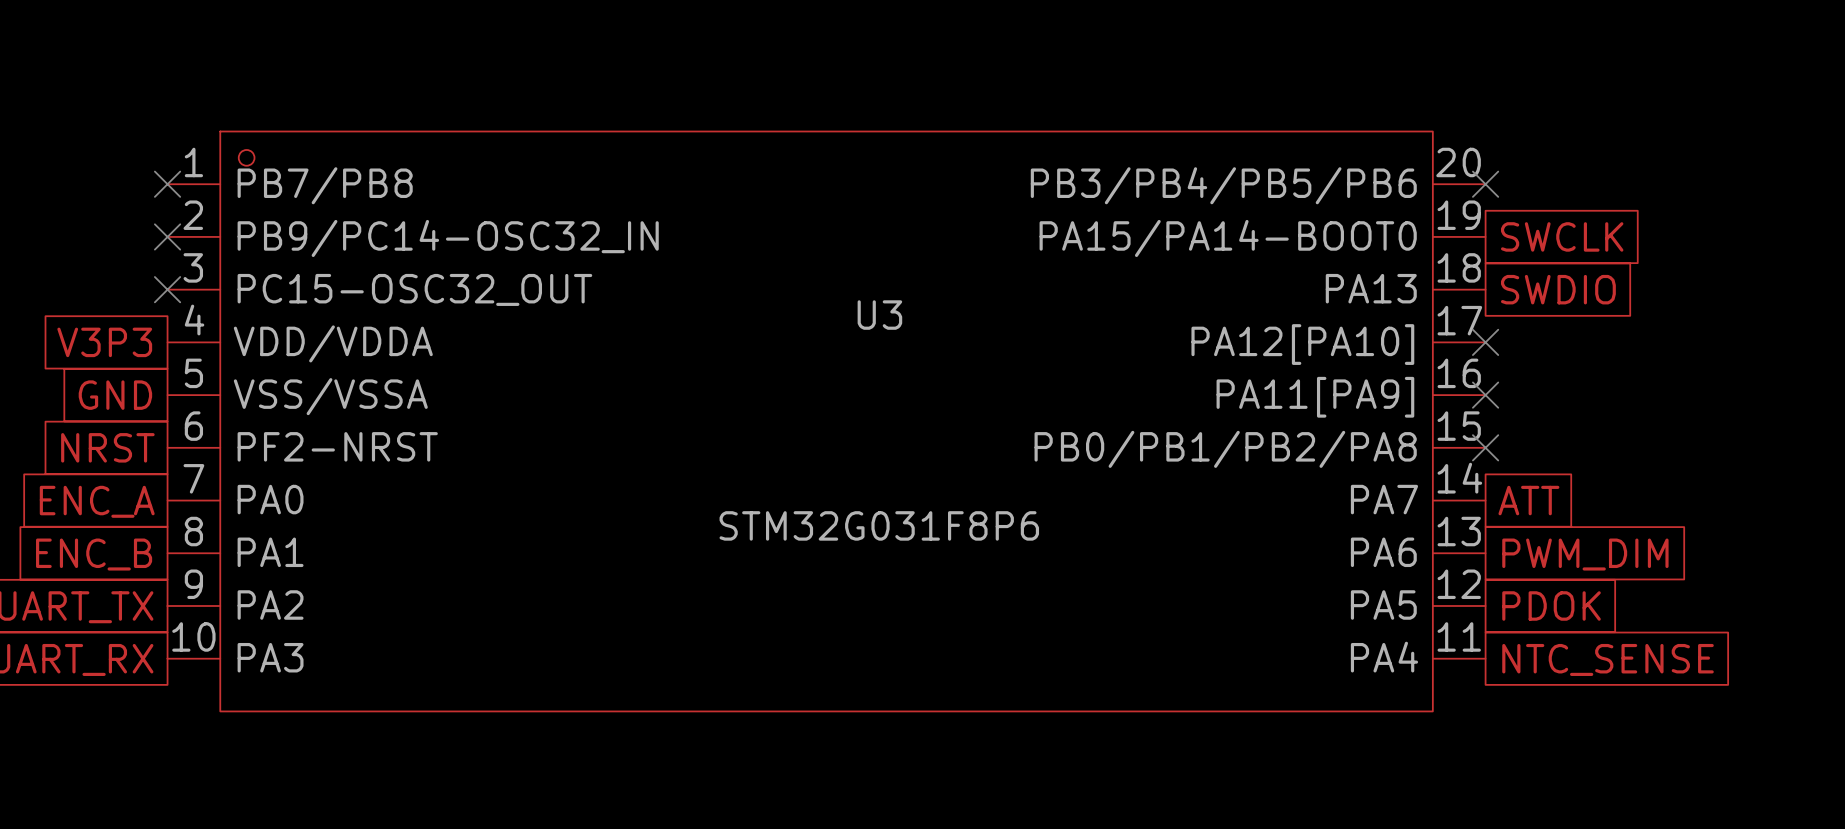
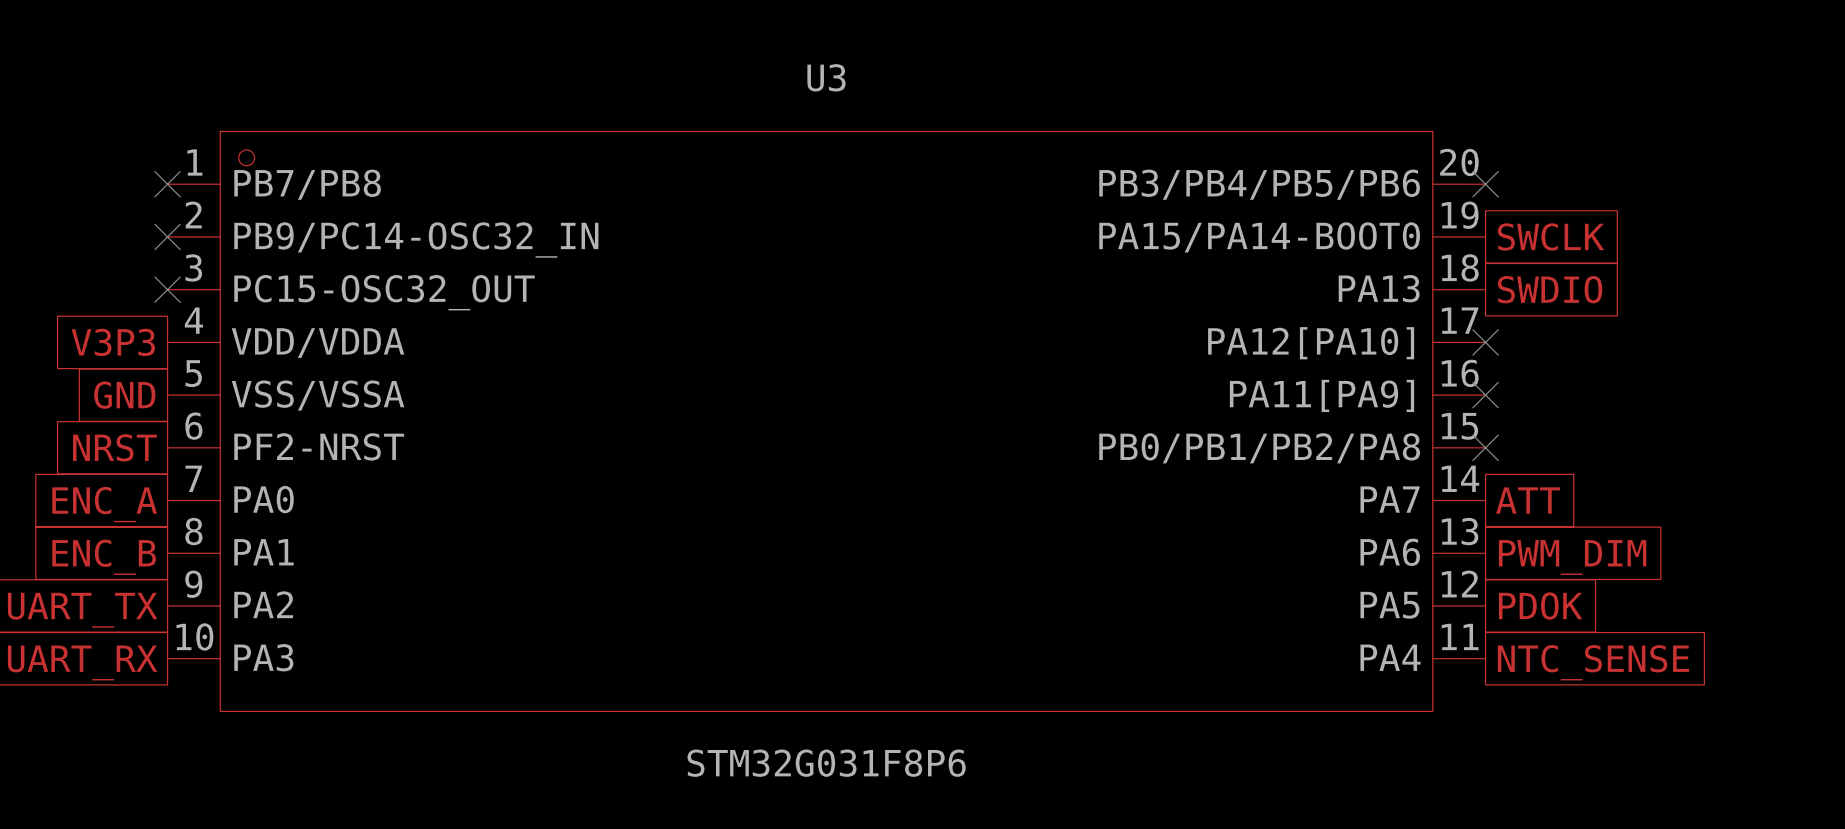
U3 name position: U3 (879, 315) -> U3 (826, 77)
U3 value position: STM32G031F8P6 (879, 525) -> STM32G031F8P6 (826, 763)

